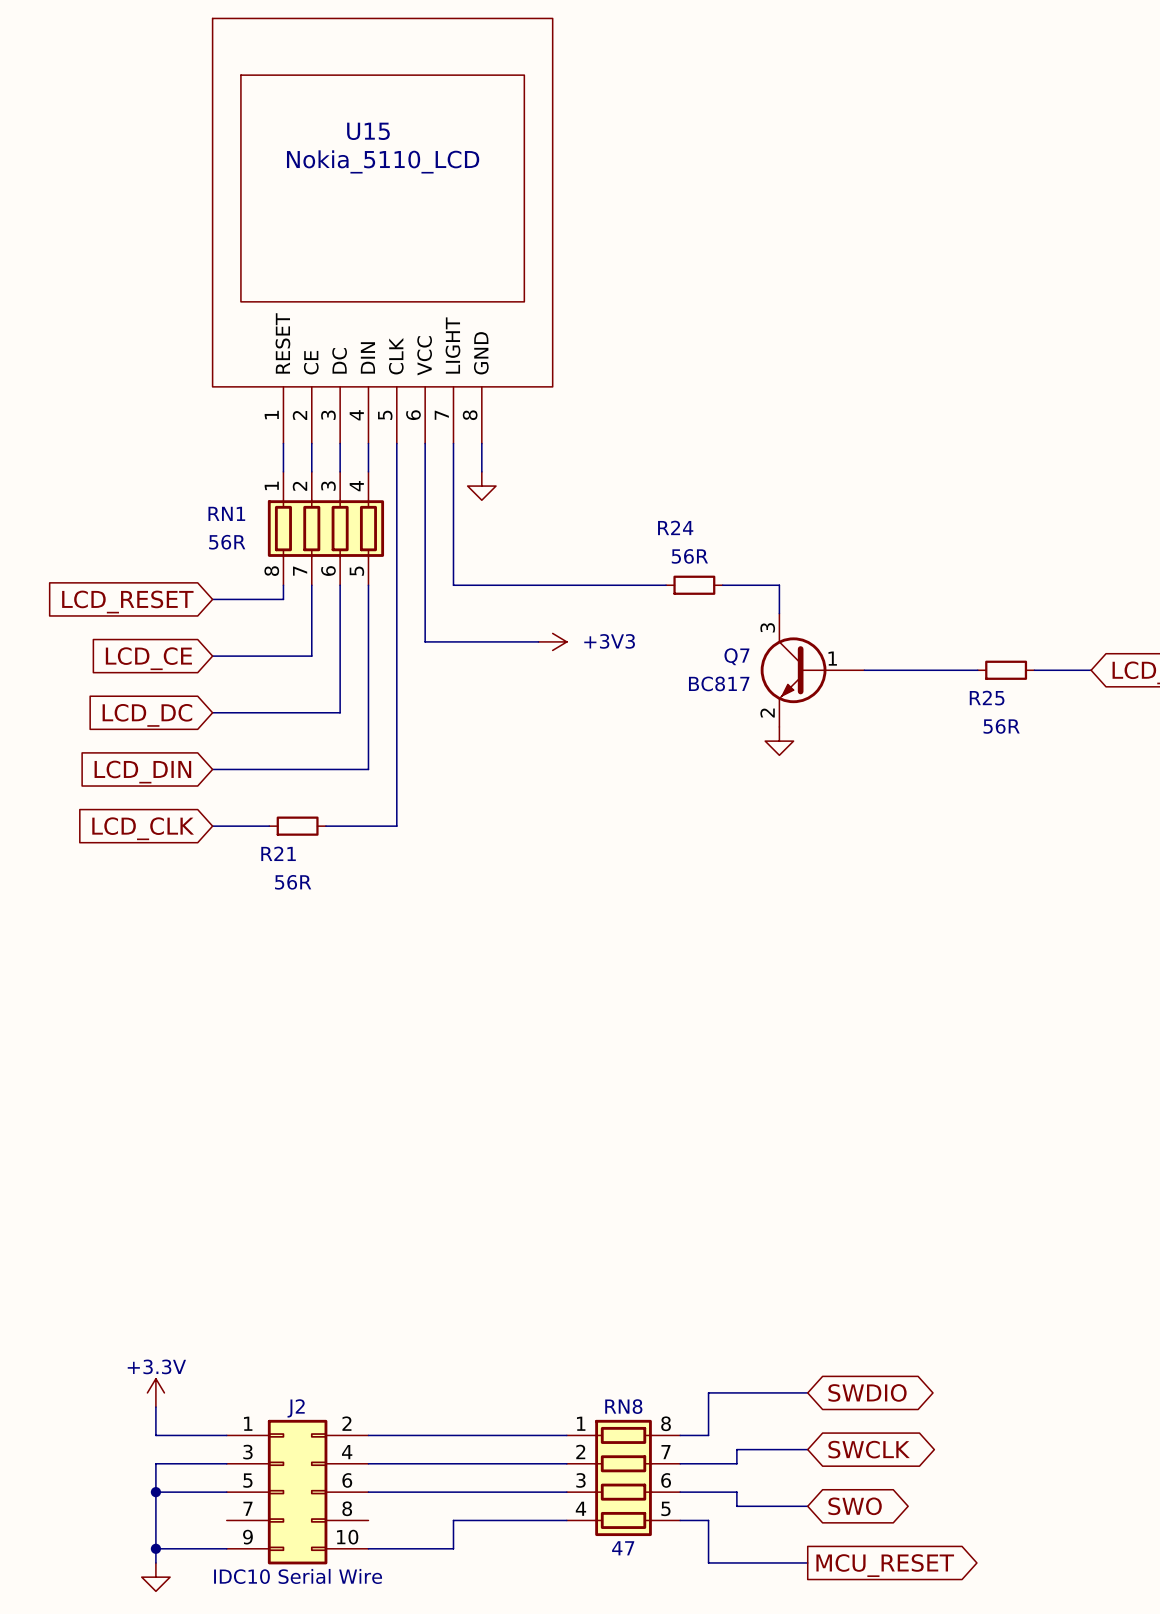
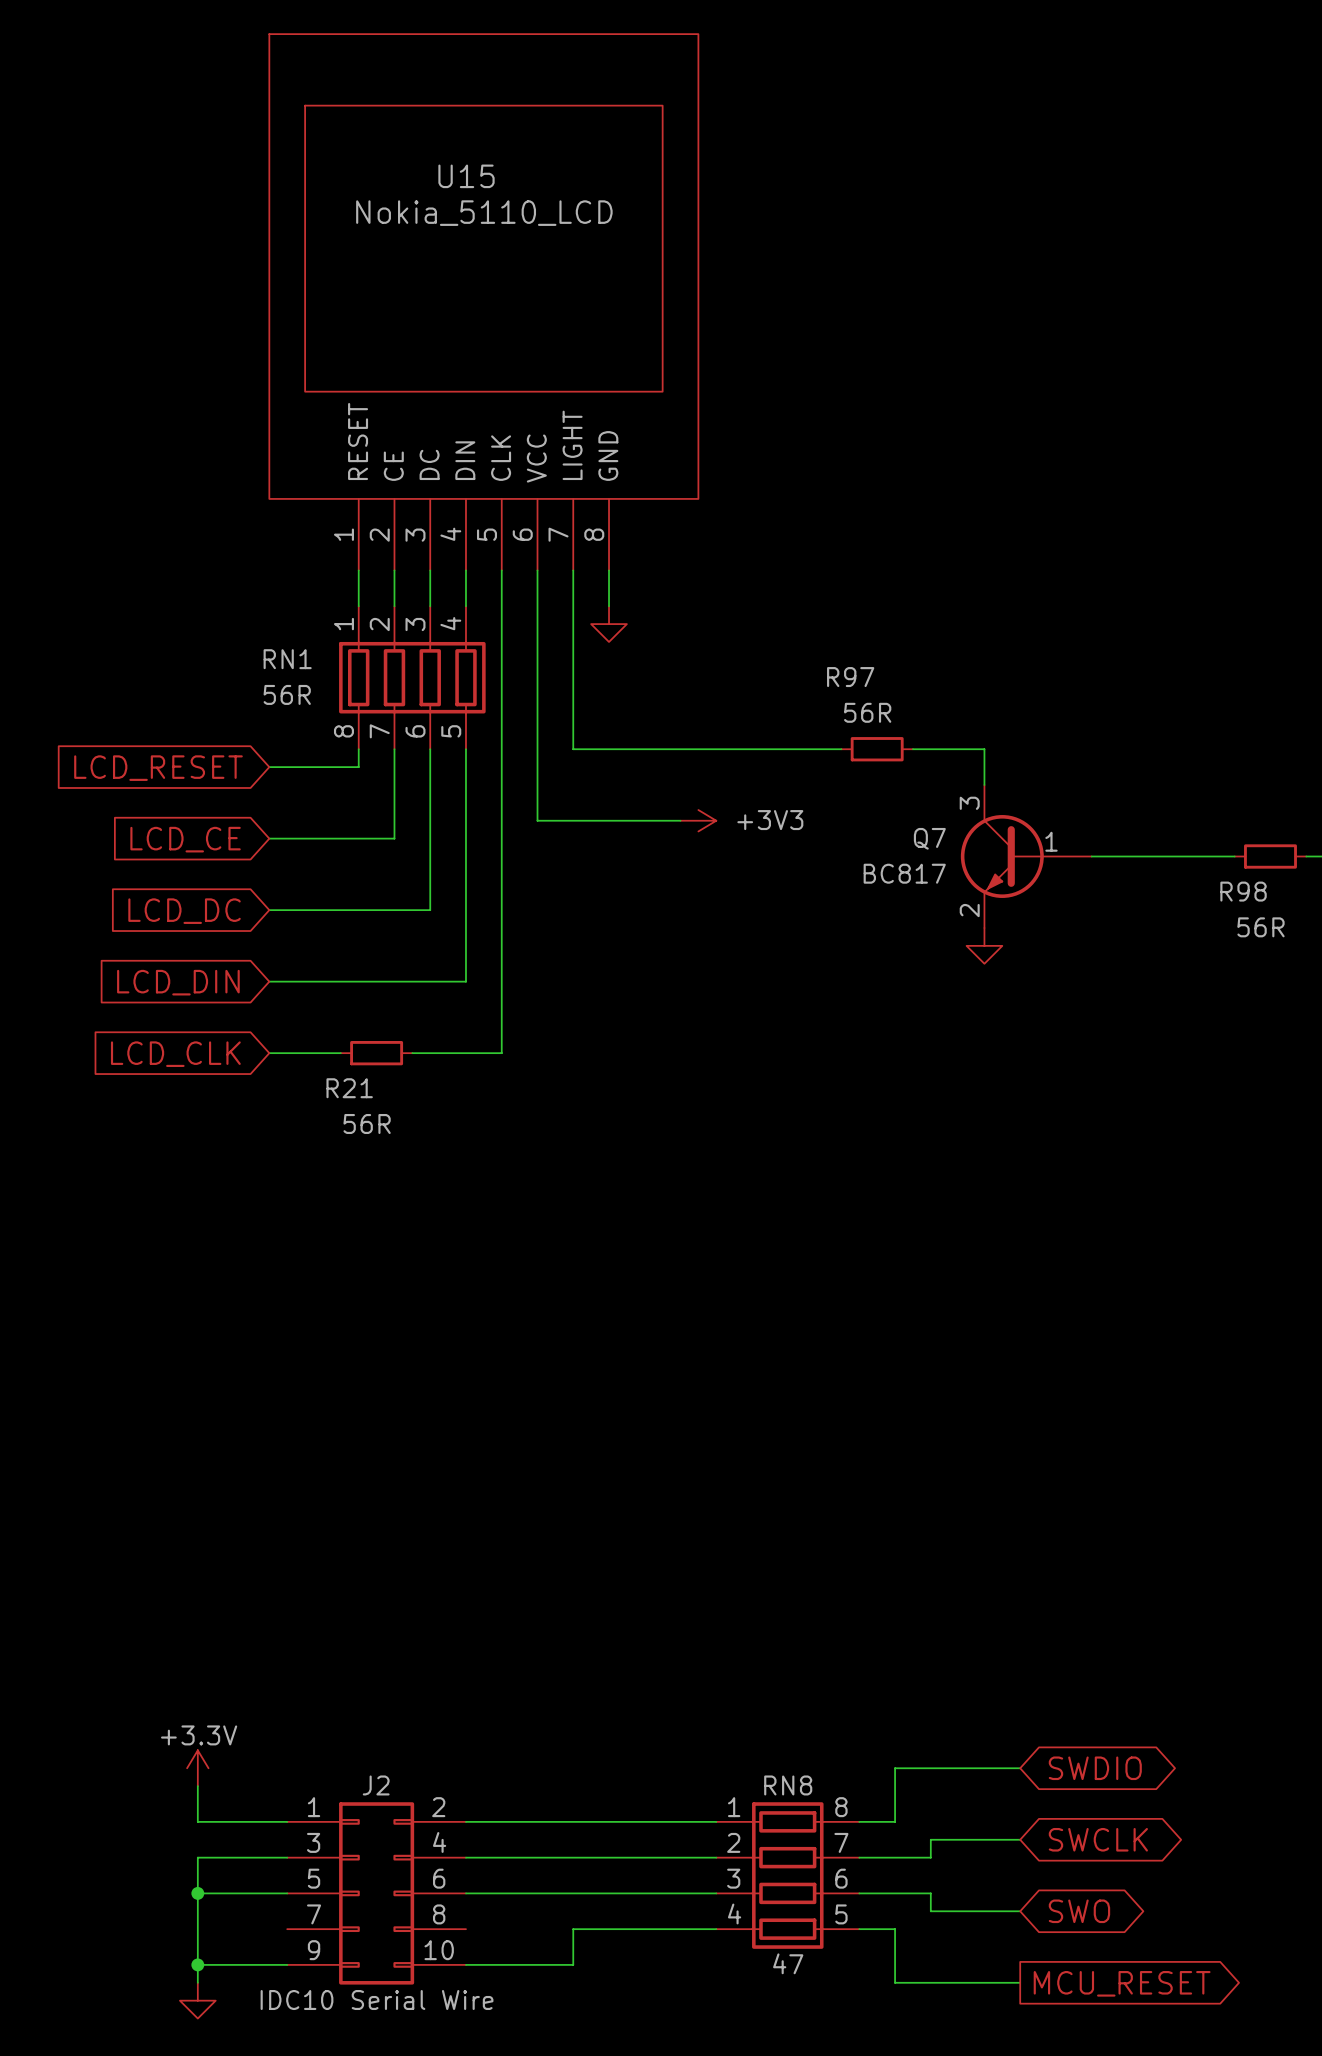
R24 name: R24 (675, 527) -> R97 (850, 677)
R25 name: R25 (987, 698) -> R98 (1243, 891)

